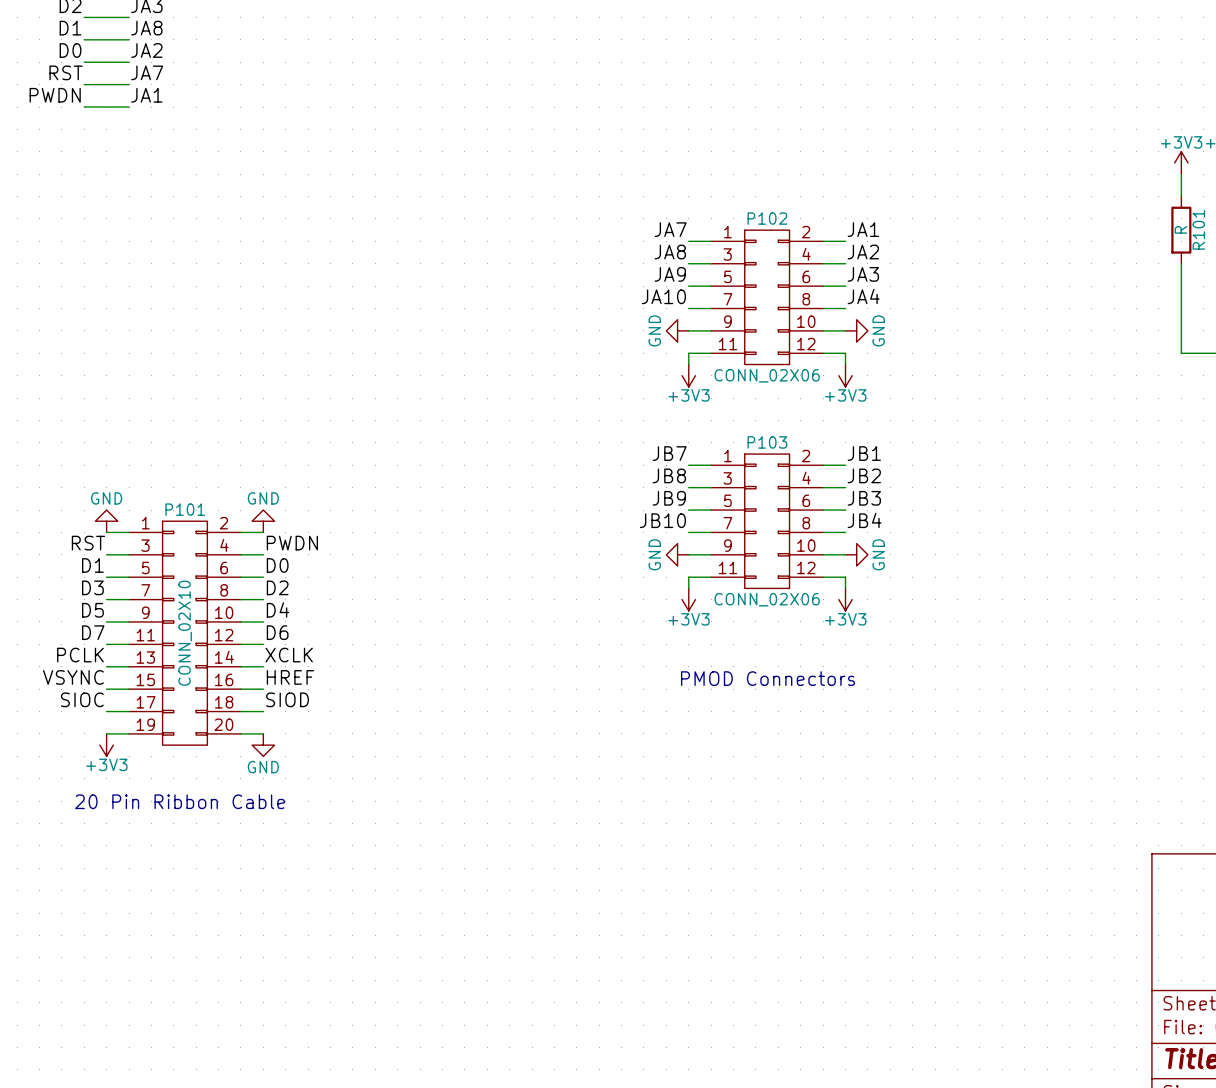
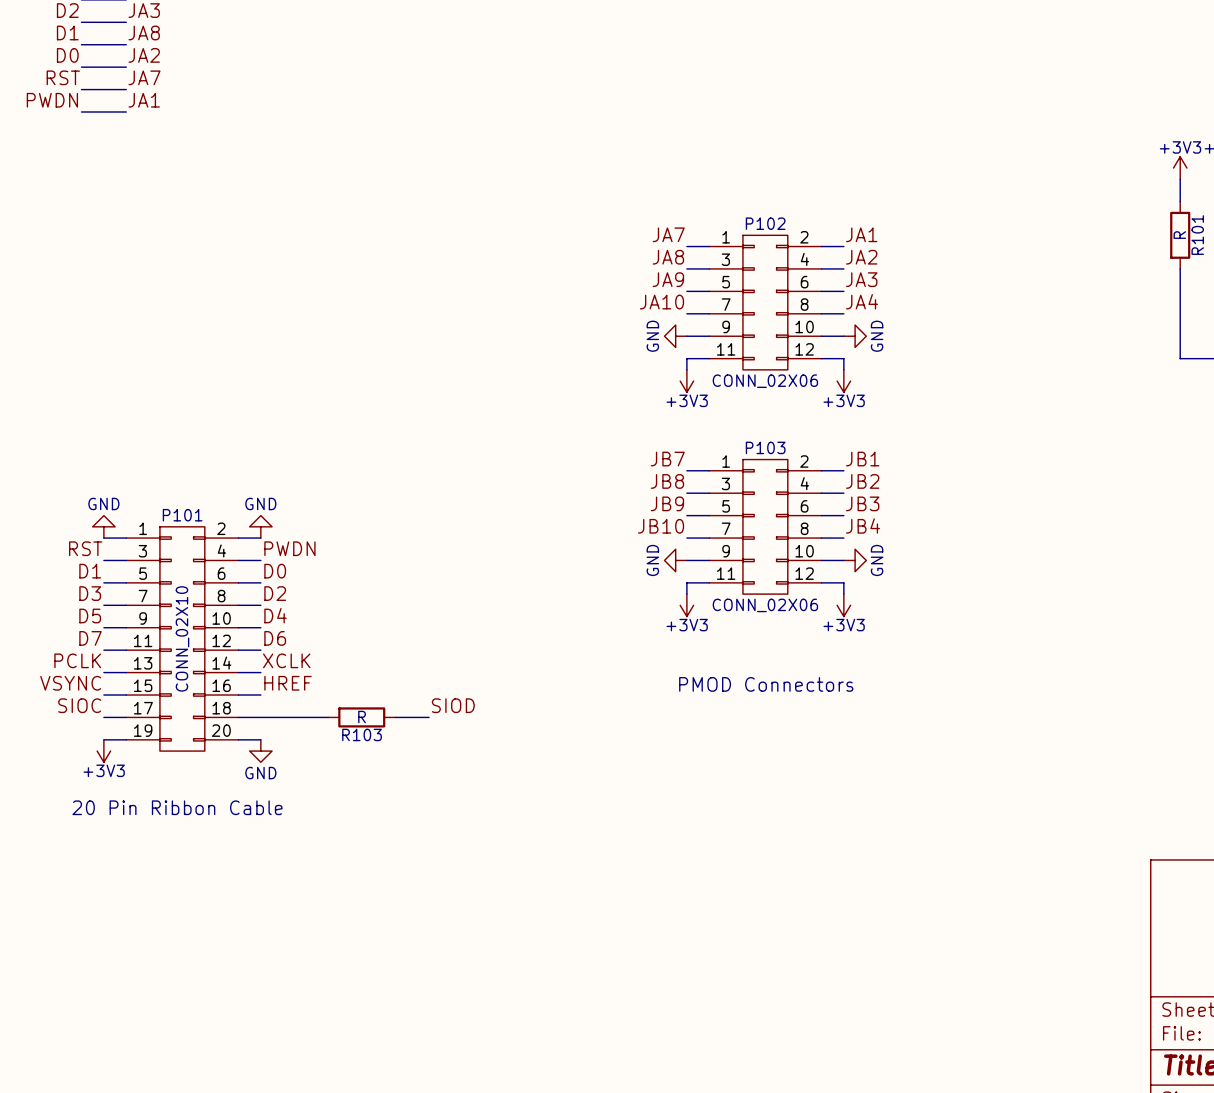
label position: SIOD (287, 699) -> SIOD (453, 705)
wire: none -> (260, 717) (328, 717)
R103: none -> R (361, 717)
wire: none -> (395, 717) (429, 717)

